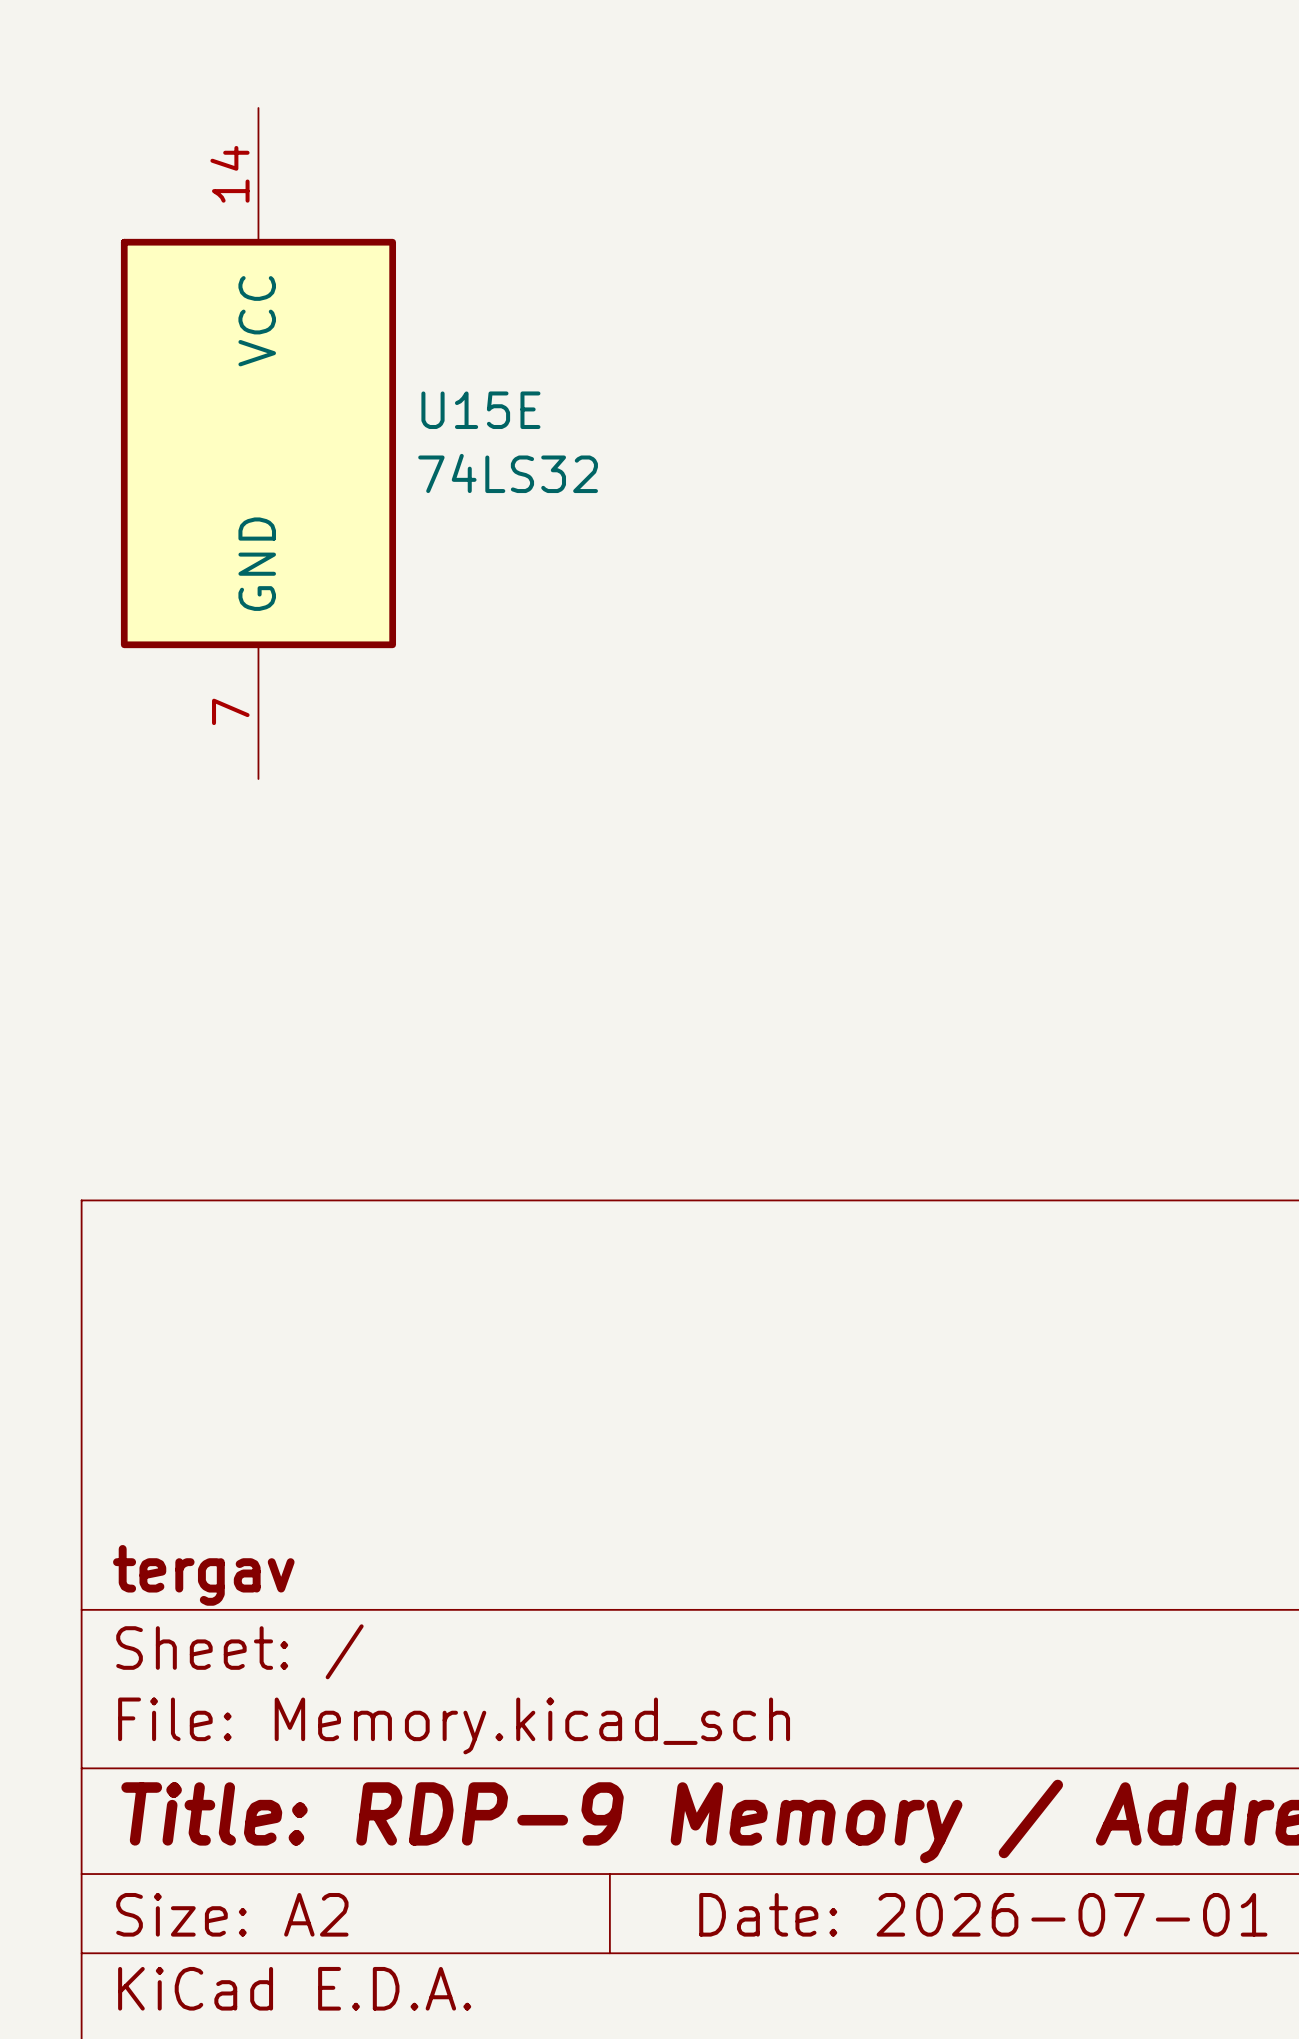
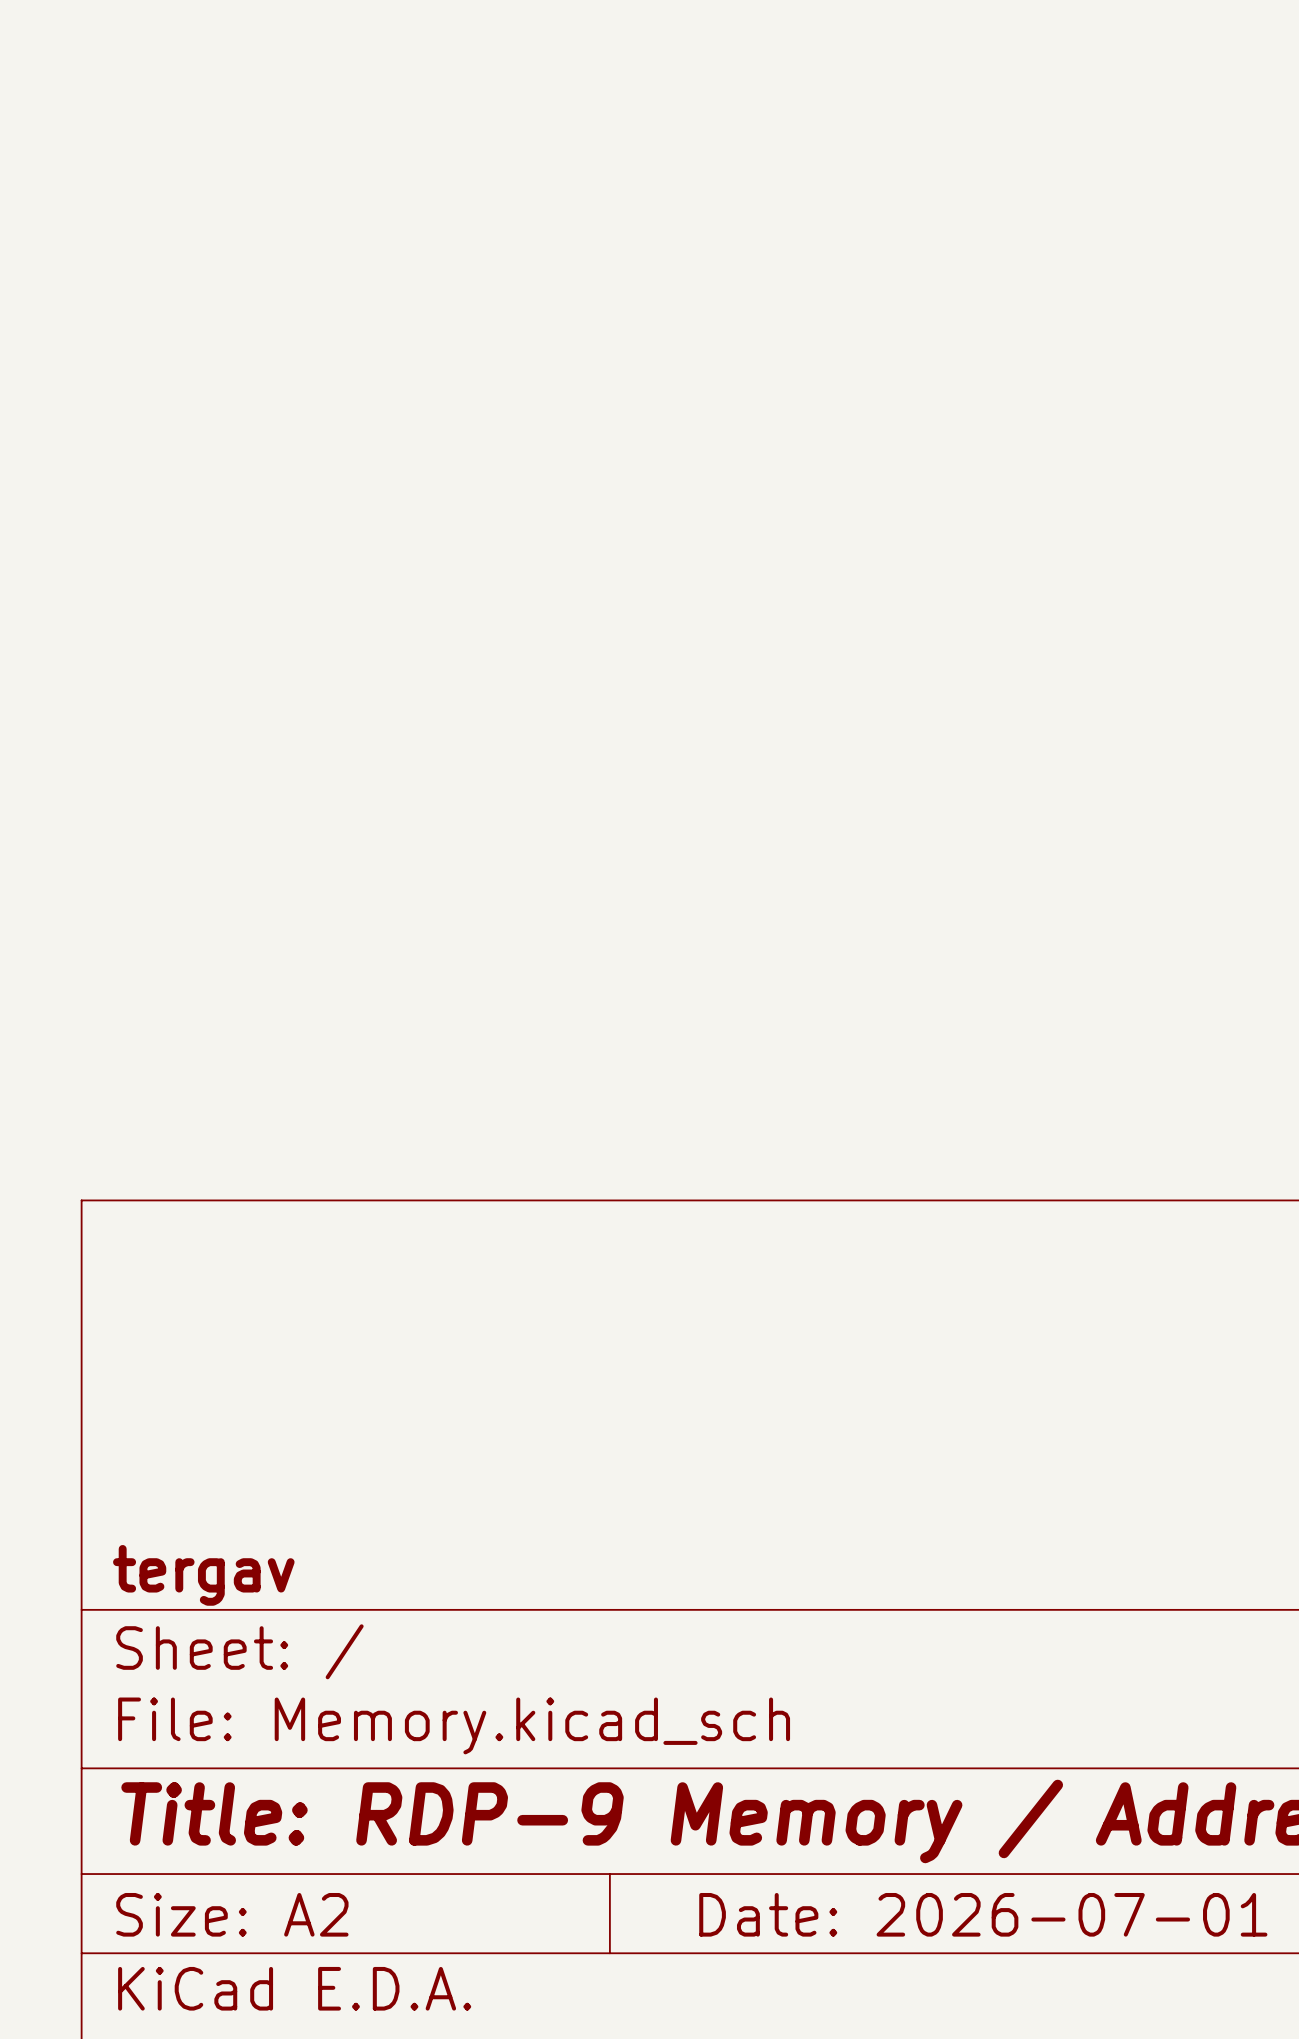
U15E: 74LS32 (258, 443) -> none

